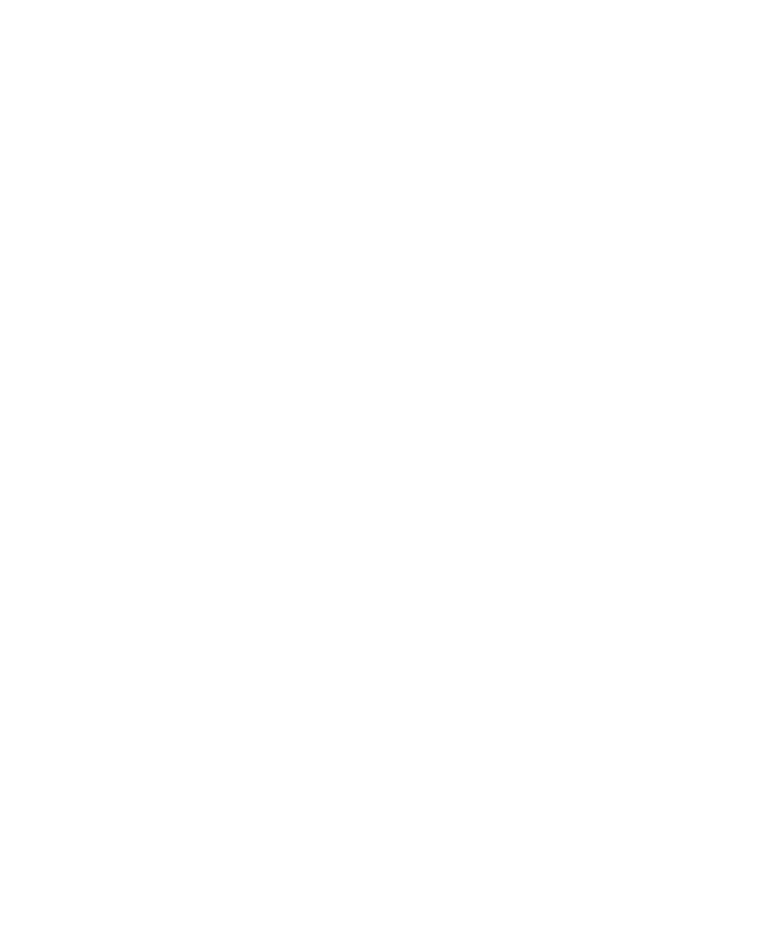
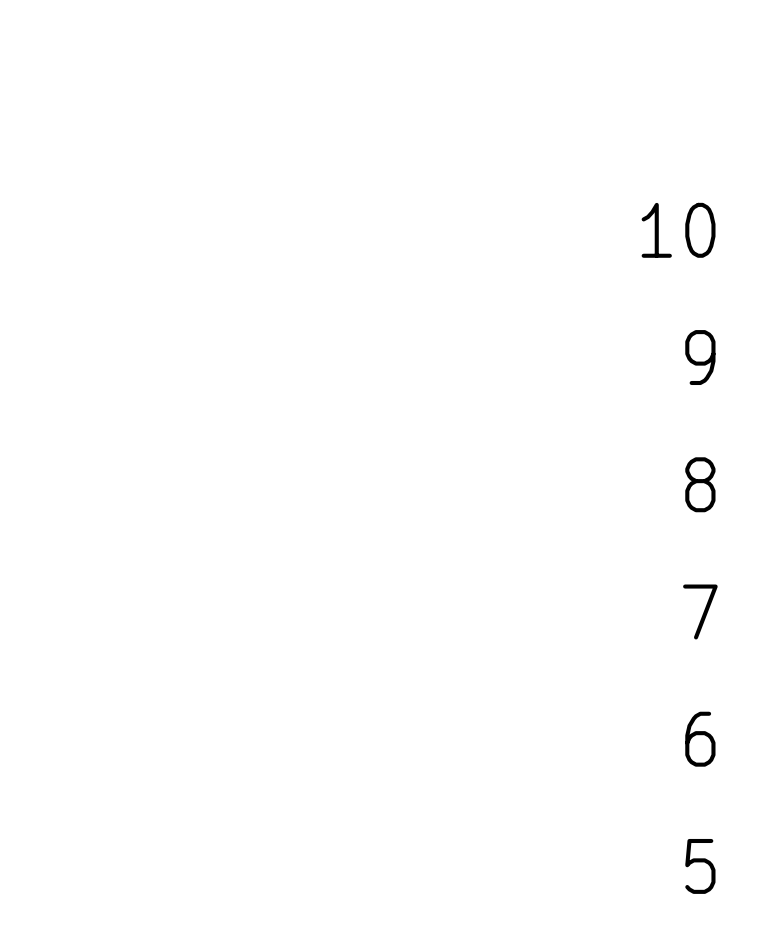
text: none -> 10 (678, 230)
text: none -> 9 (700, 357)
text: none -> 8 (700, 484)
text: none -> 7 (700, 611)
text: none -> 6 (700, 739)
text: none -> 5 (700, 866)

